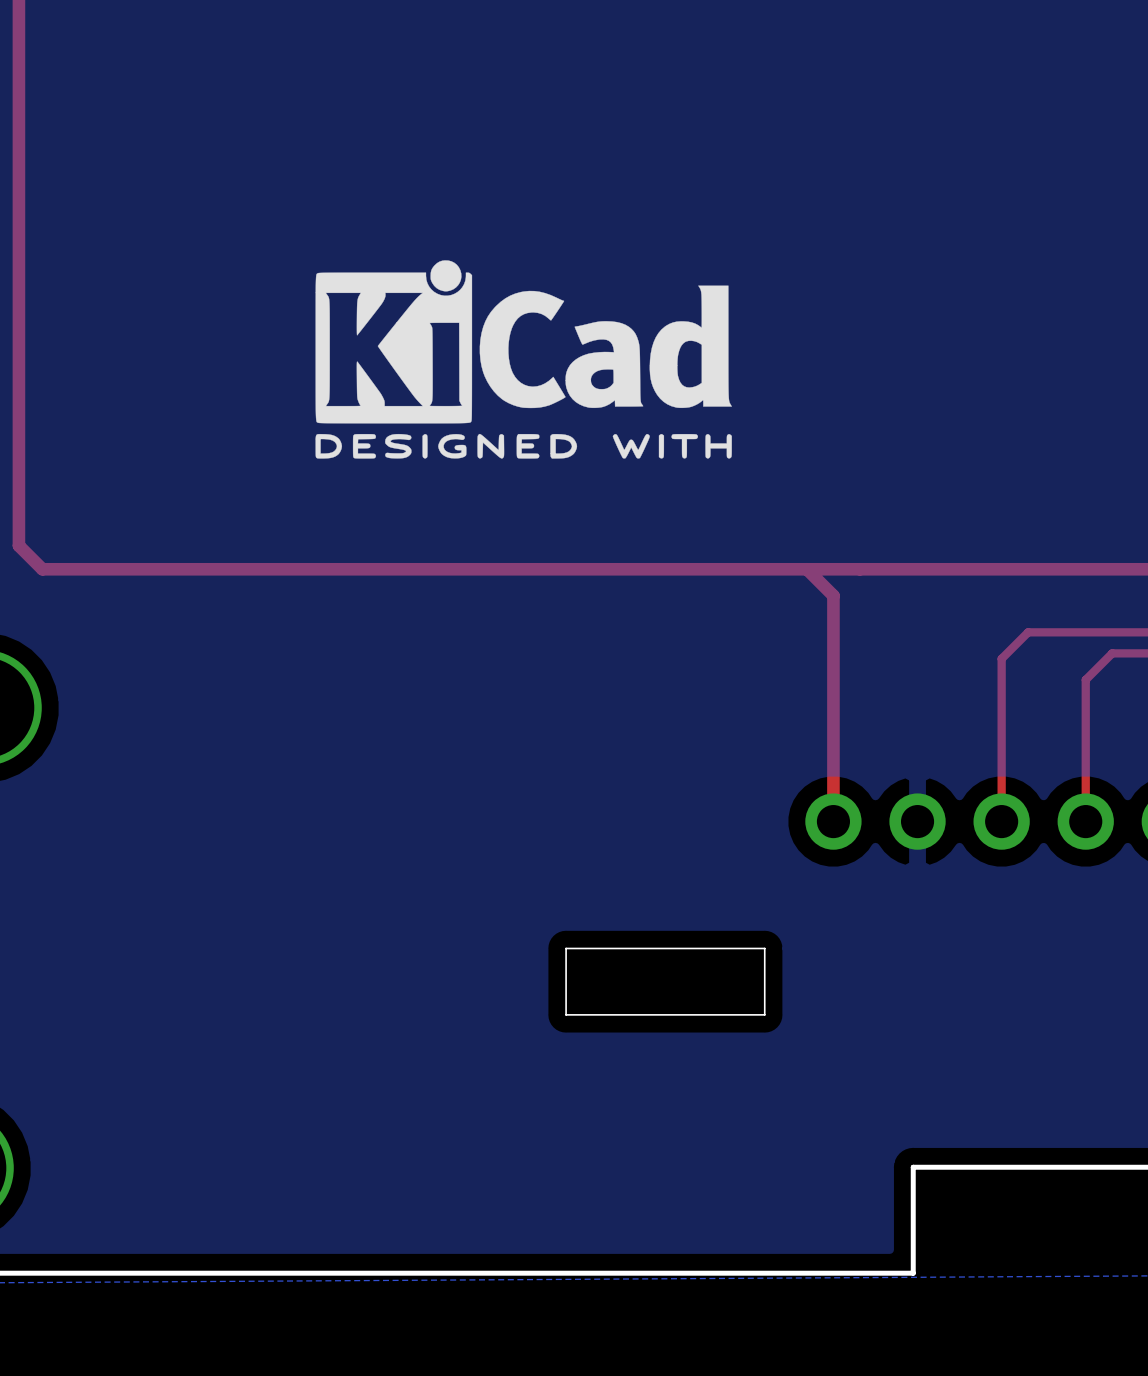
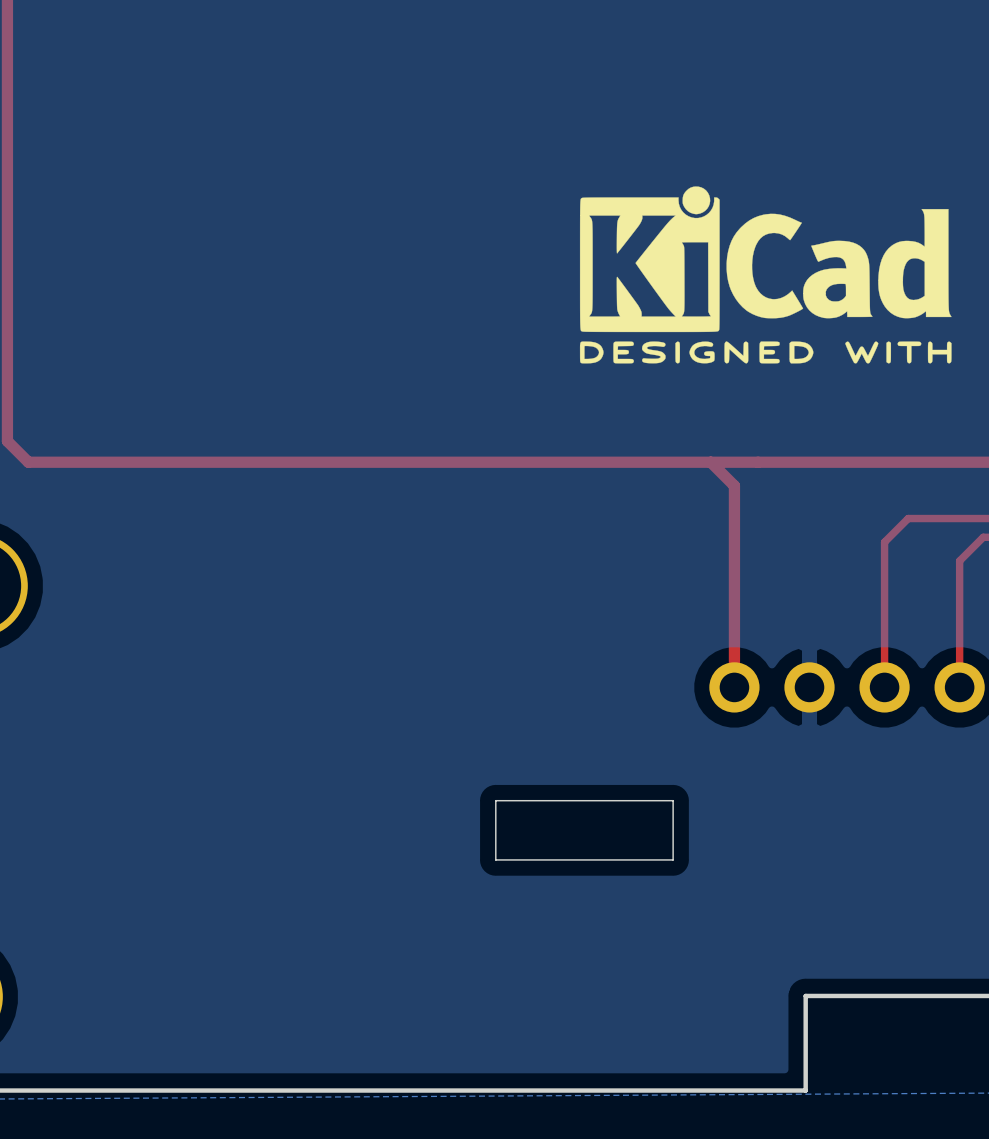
drawing position: (523, 359) -> (765, 274)

